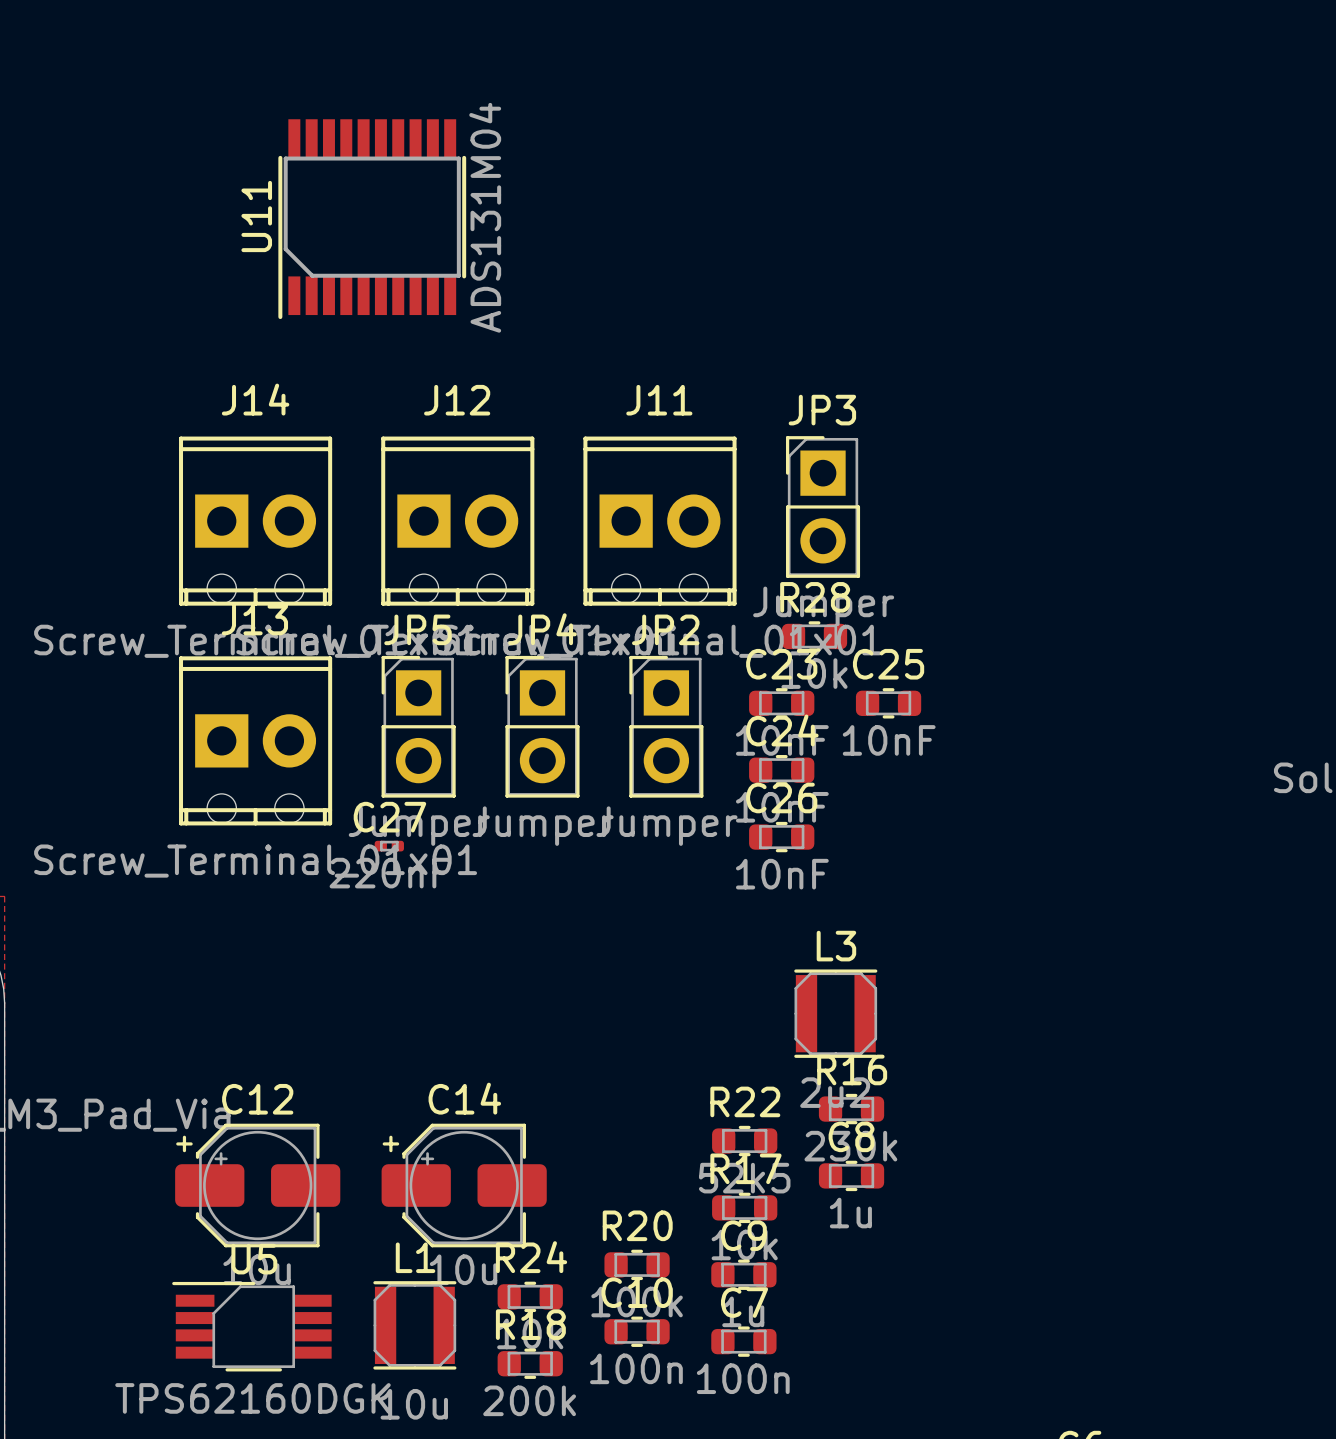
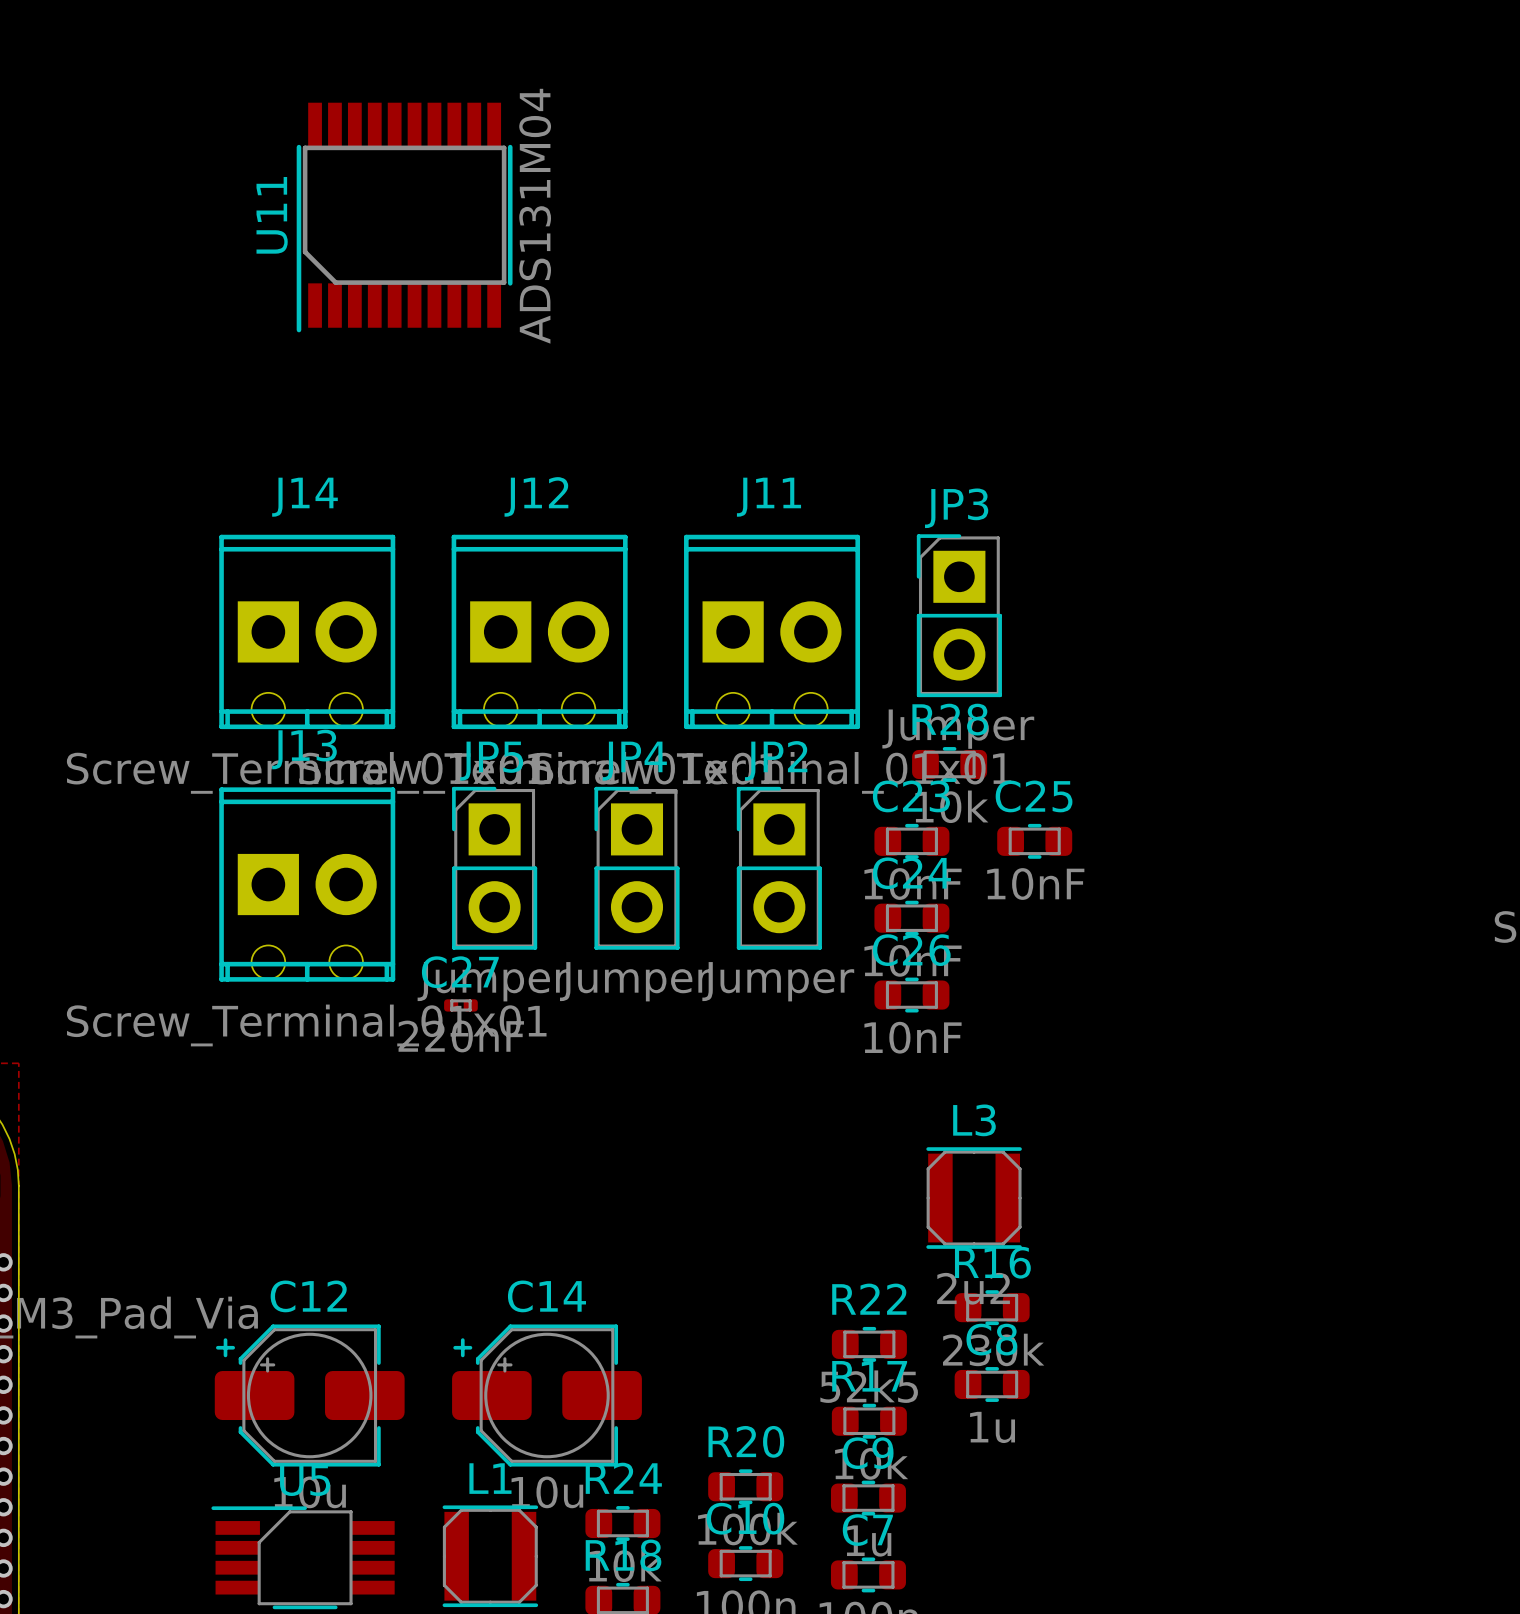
U11 position: (372, 219) -> (404, 217)

